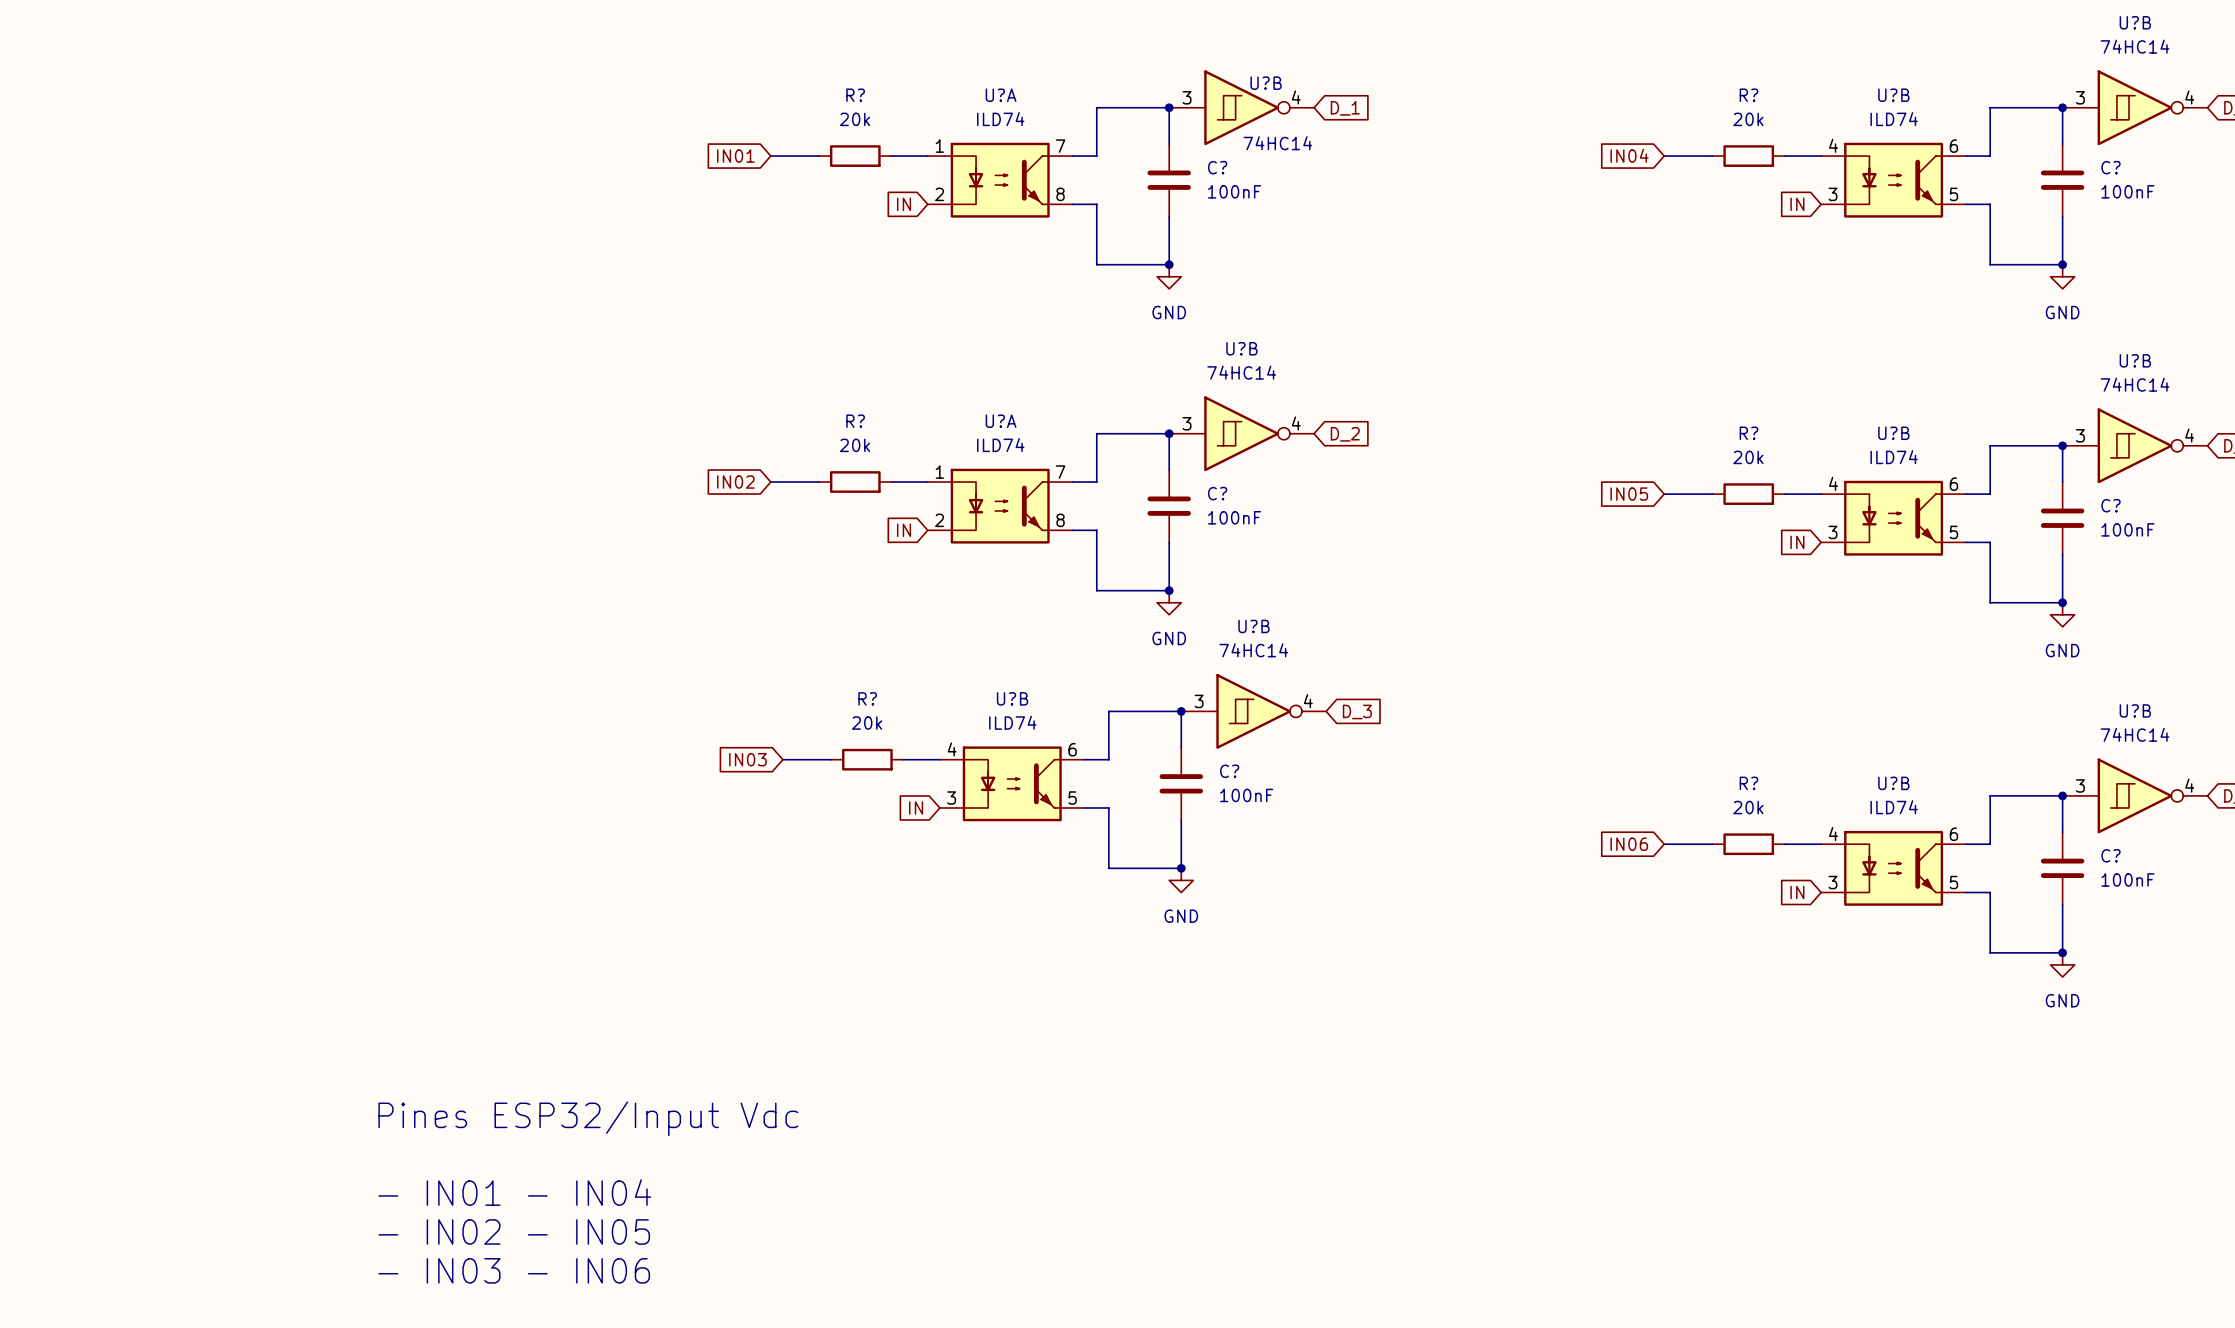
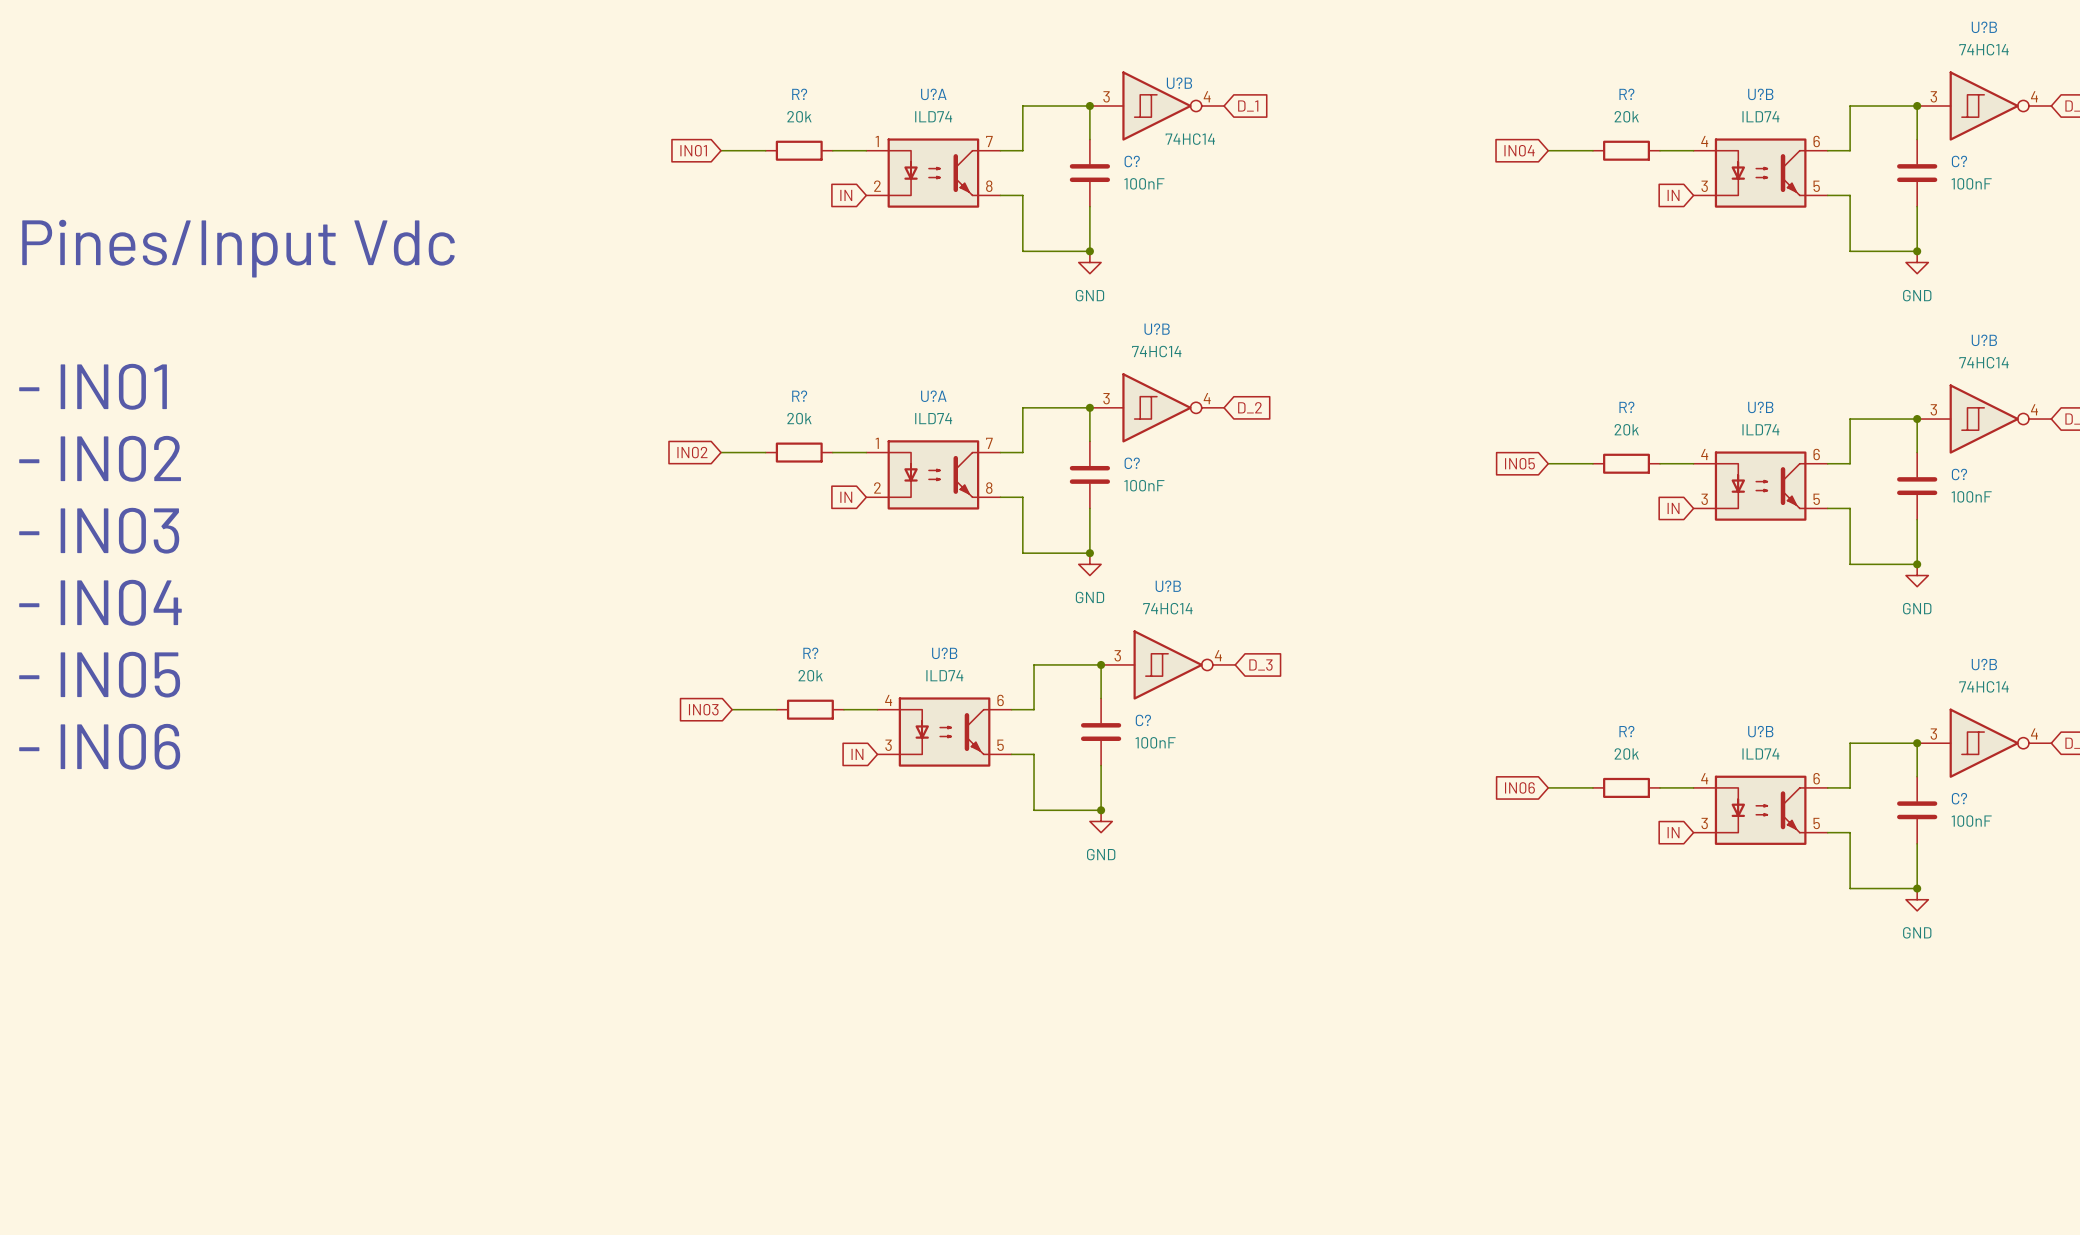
text: none -> Pines/Input Vdc (238, 248)
text: none -> - IN01 (93, 386)
text: none -> - IN02 (100, 458)
text: none -> - IN03 (99, 530)
text: none -> - IN04 (100, 602)
text: none -> - IN05 (99, 674)
text: none -> - IN06 (99, 746)
text: Pines ESP32/Input Vdc (588, 1118) -> none
text: - IN01 - IN04 (514, 1192) -> none
text: - IN02 - IN05 (514, 1231) -> none
text: - IN03 - IN06 (514, 1270) -> none

